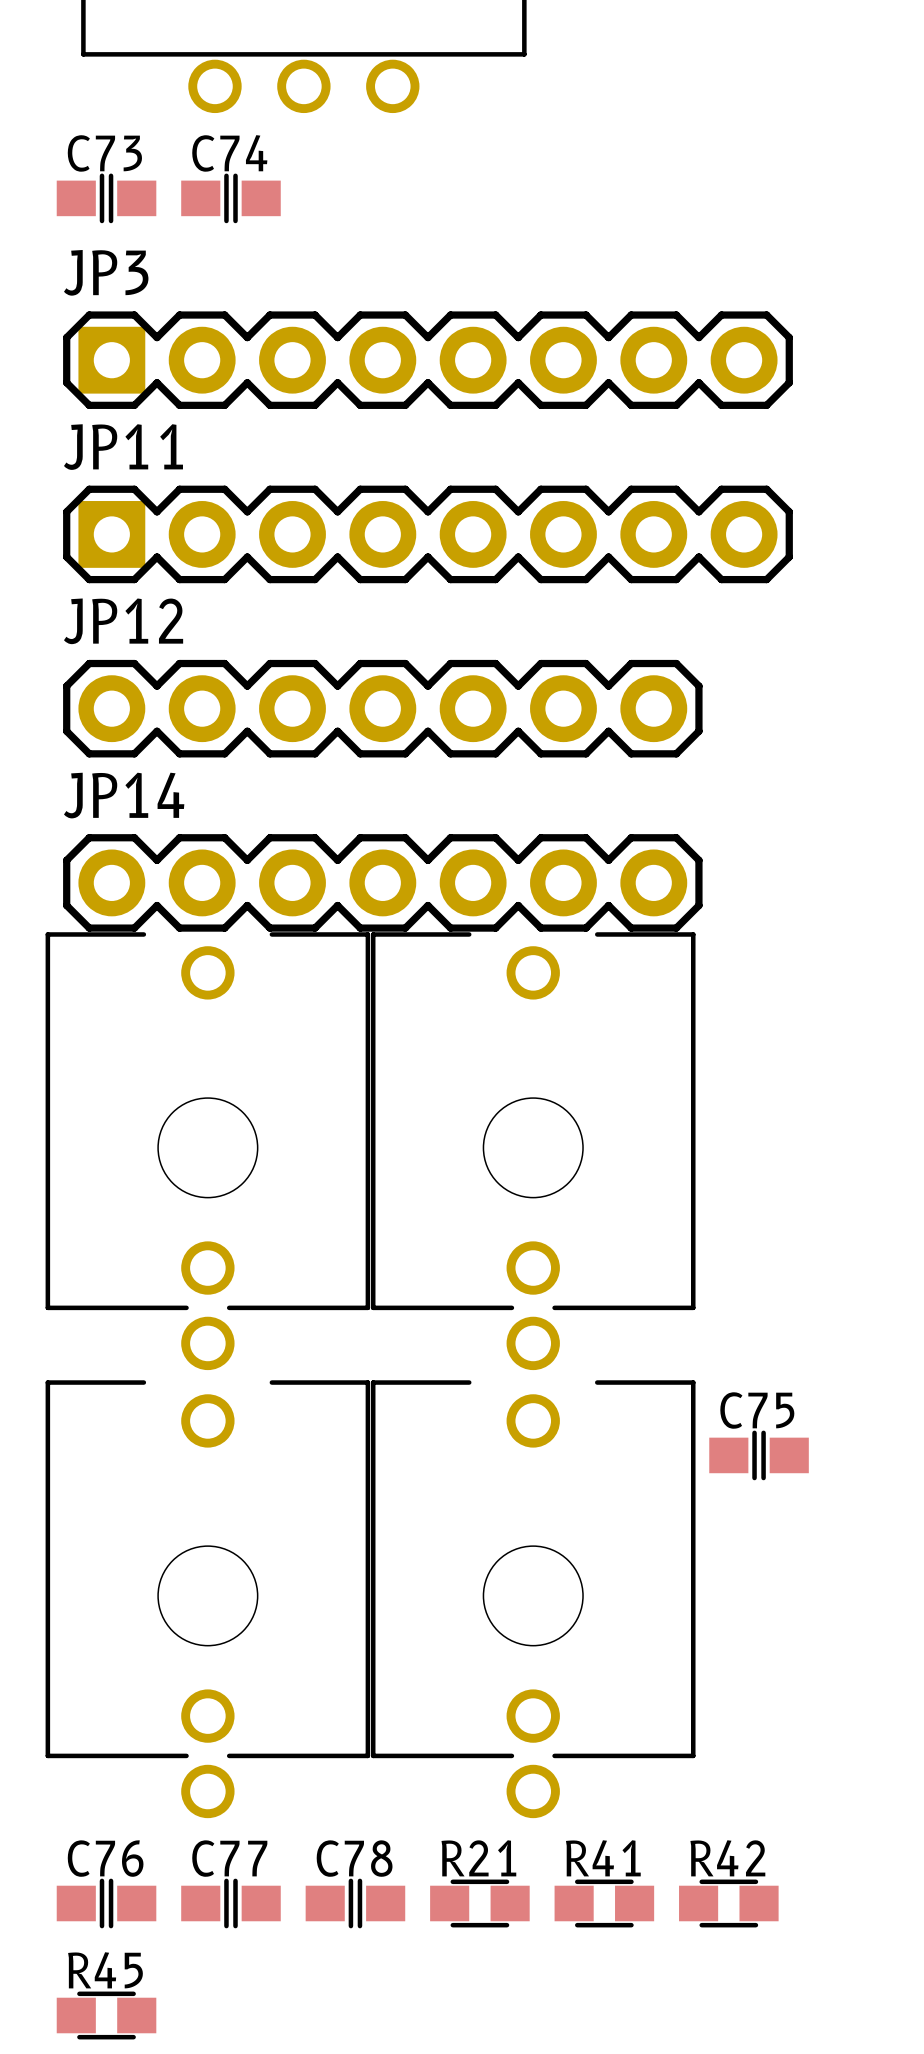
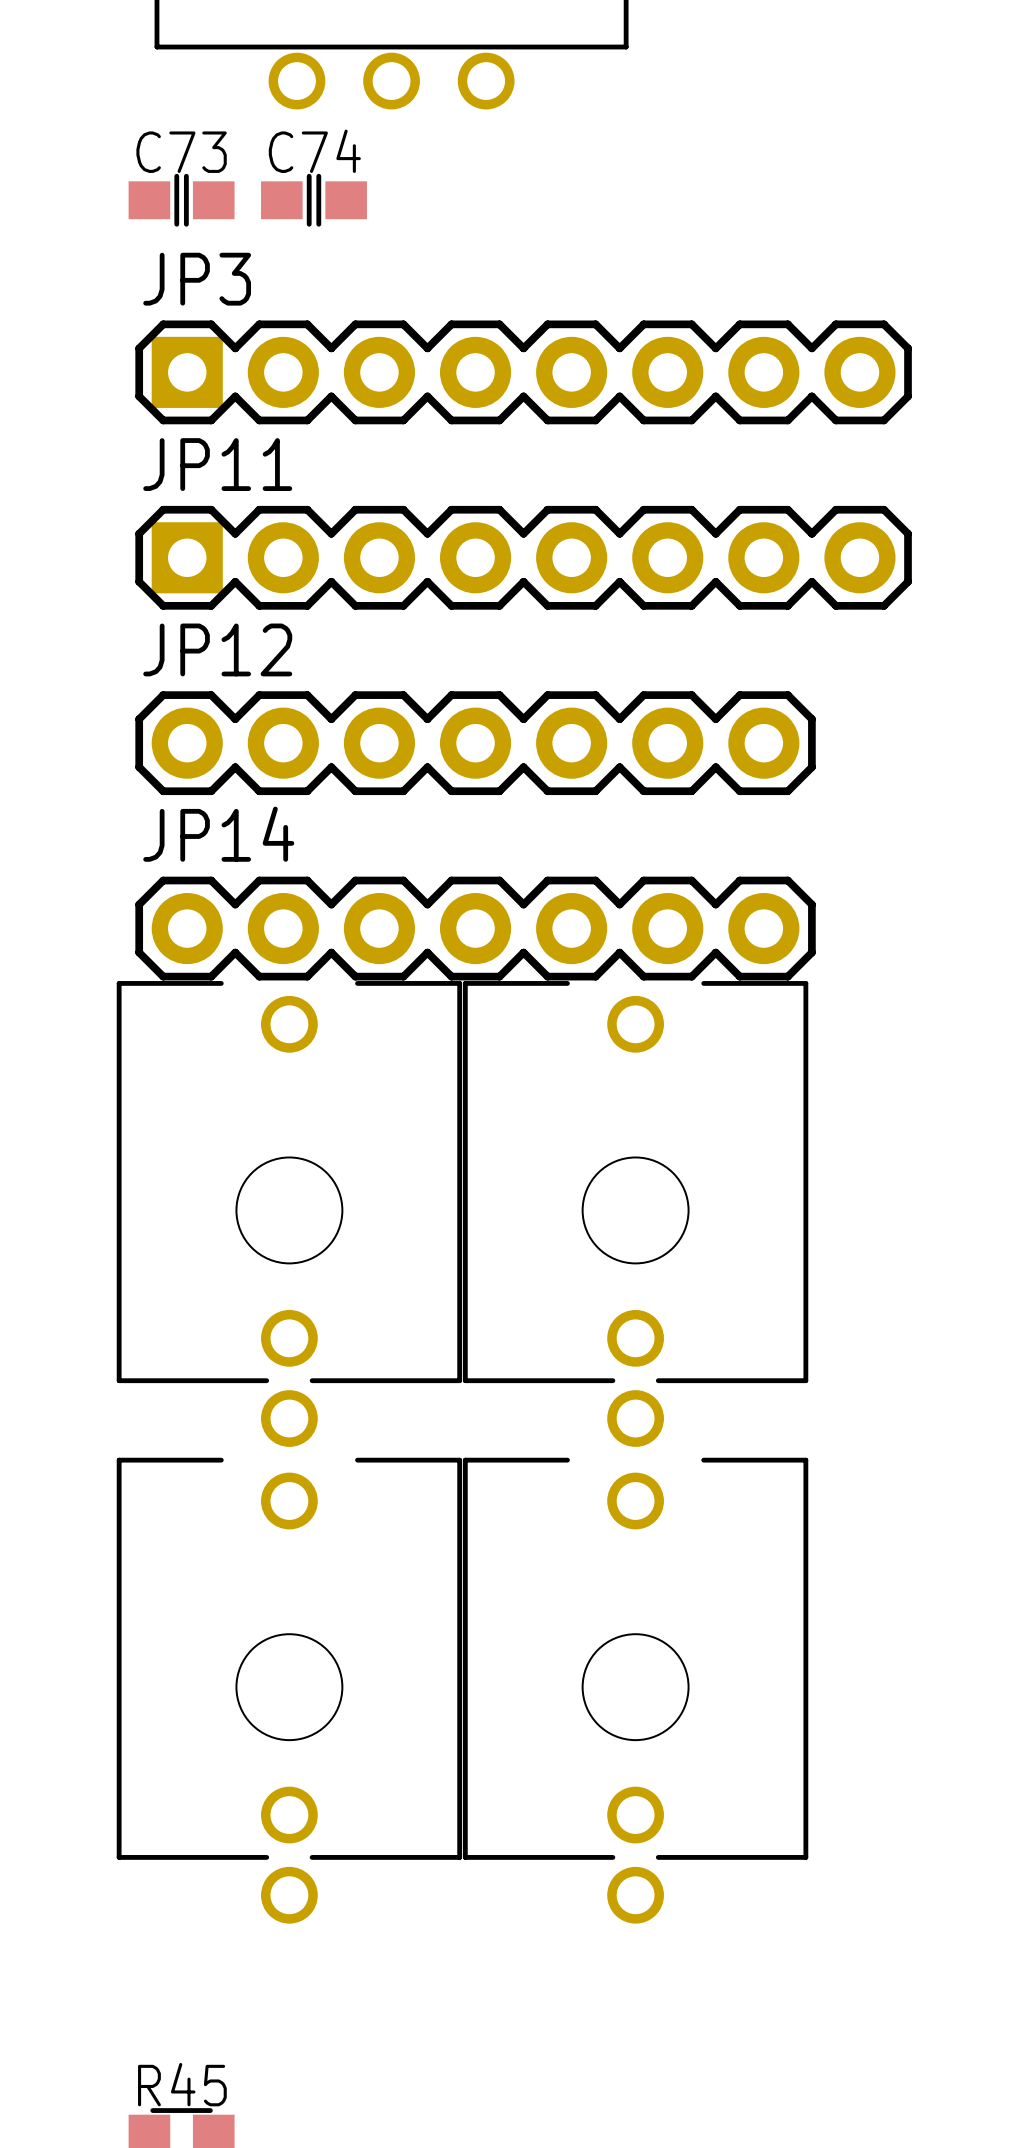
C75: (759, 1455) -> none
C76: (106, 1903) -> none
C77: (230, 1903) -> none
C78: (355, 1903) -> none
R21: (479, 1903) -> none
R41: (604, 1903) -> none
R42: (728, 1903) -> none

